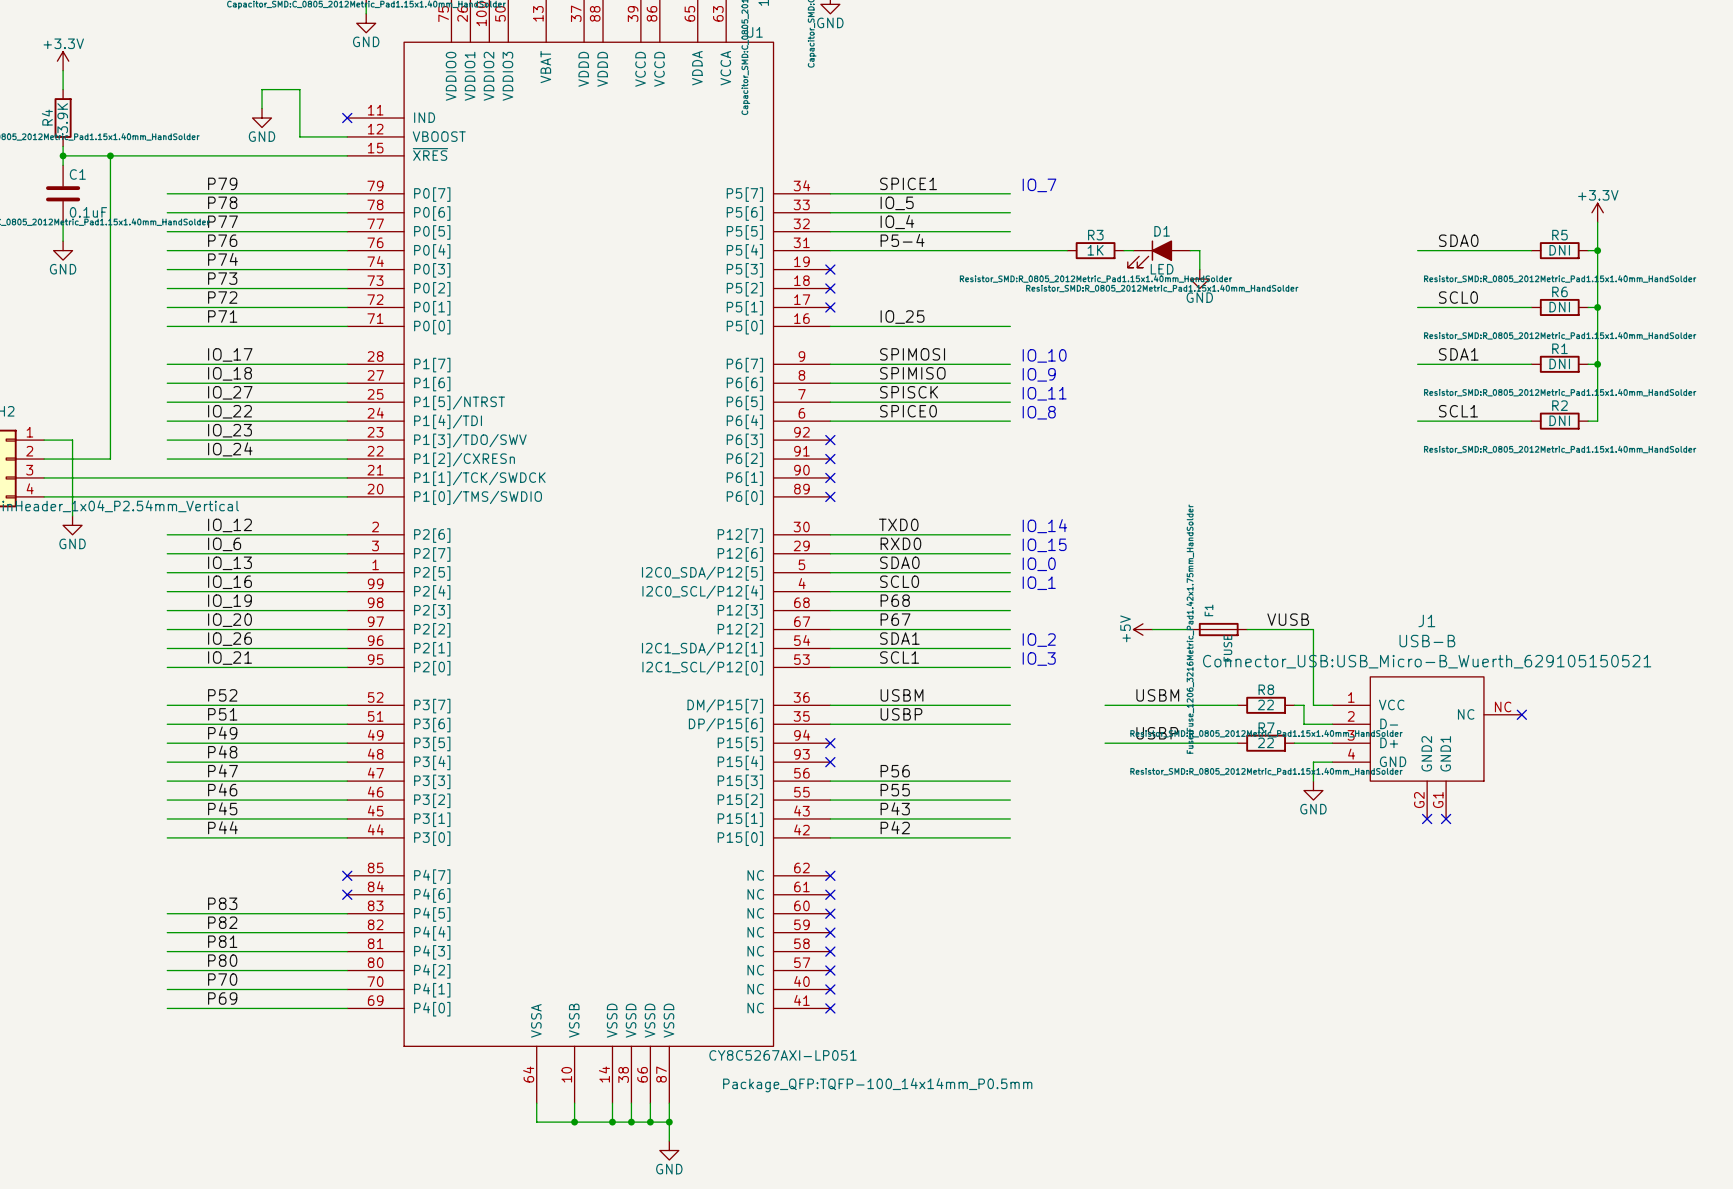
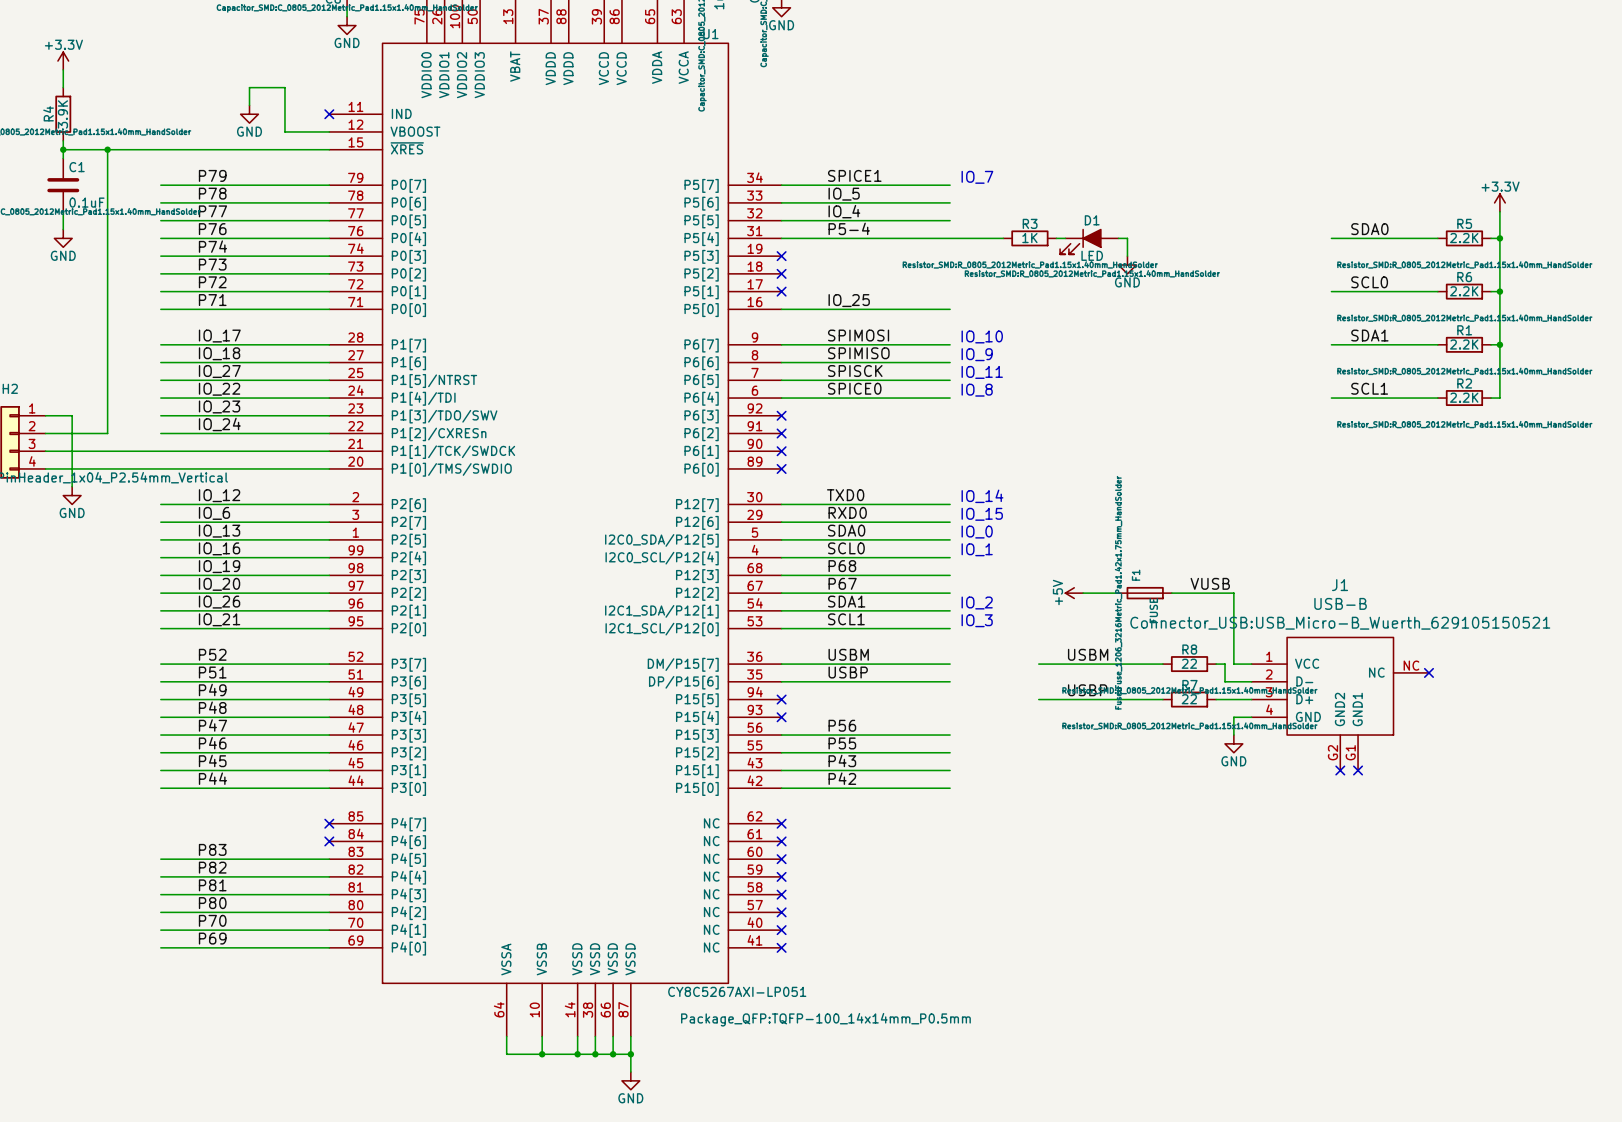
R5 value: DNI (1559, 250) -> 2.2K (1464, 238)
R6 value: DNI (1559, 307) -> 2.2K (1464, 291)
R1 value: DNI (1559, 363) -> 2.2K (1464, 344)
R2 value: DNI (1559, 420) -> 2.2K (1464, 397)

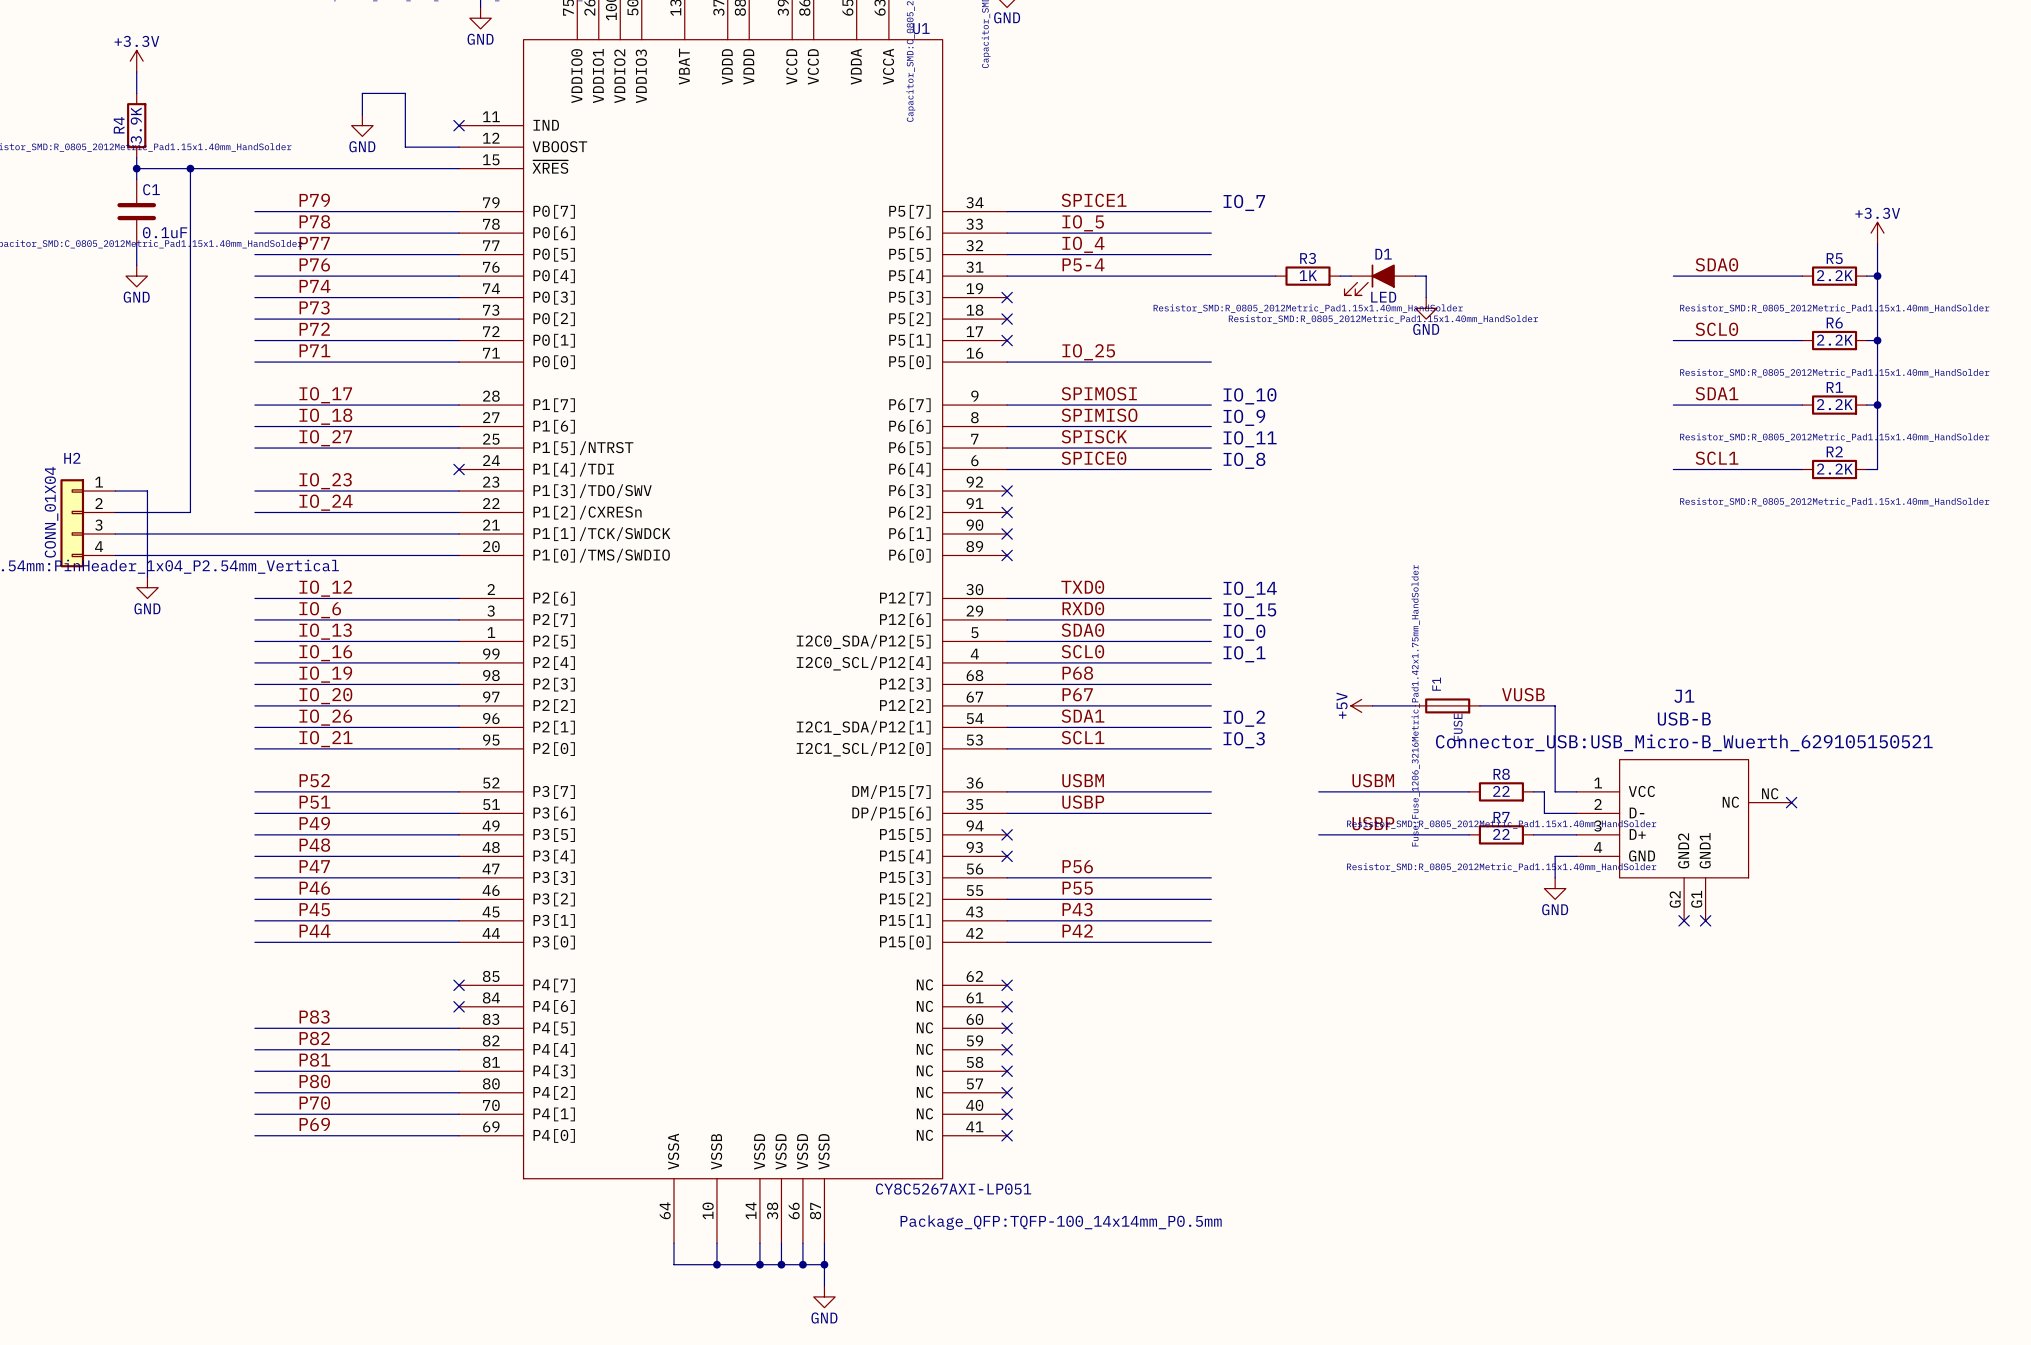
label: IO_22 (219, 389) -> none
wire: (160, 398) (329, 398) -> none
no-connect mark: none -> (459, 469)

